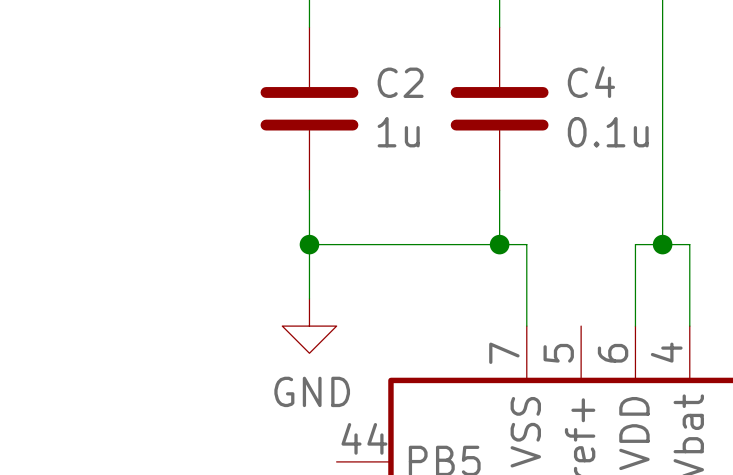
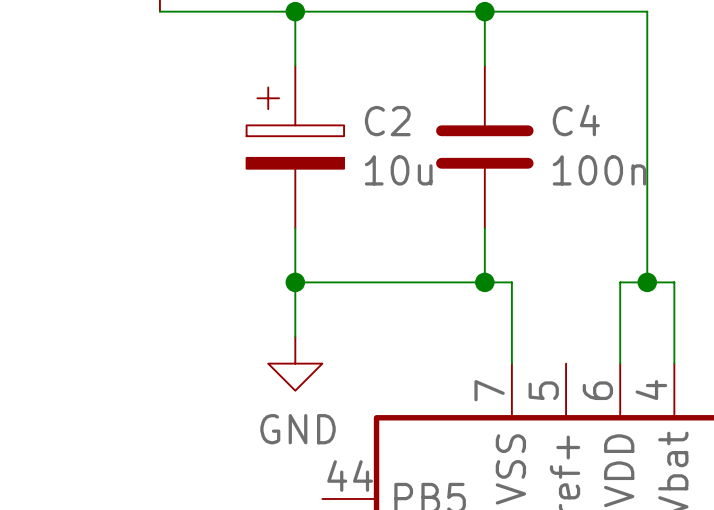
C2 symbol: [260, 27, 359, 191] -> [246, 65, 345, 229]
C2 value: 1u (398, 132) -> 10u (398, 170)
C4 value: 0.1u (608, 132) -> 100n (599, 170)

